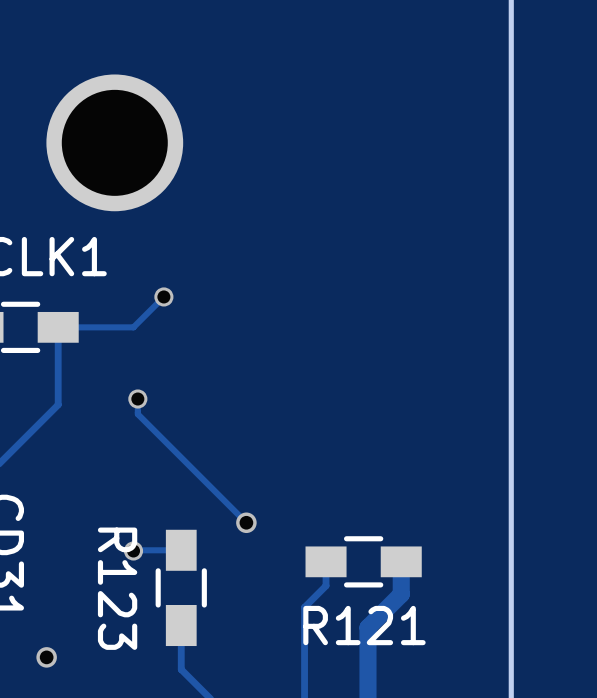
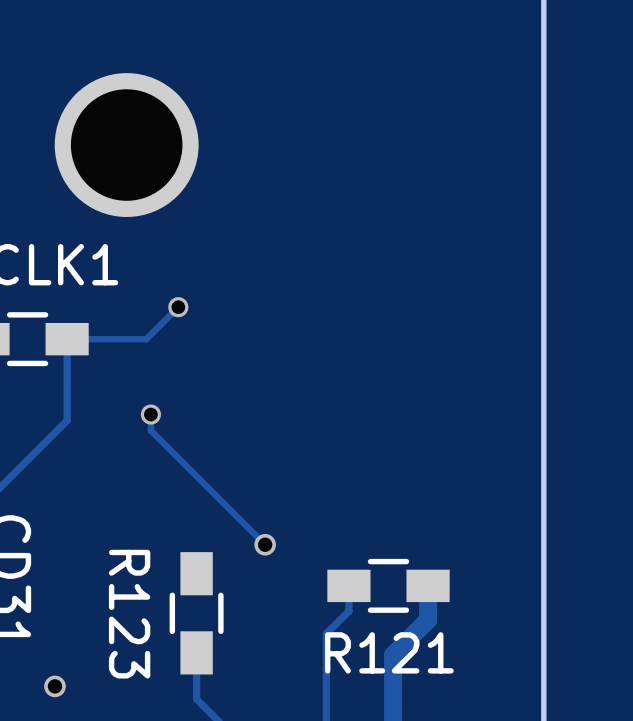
via: (133, 550) -> none
track: (181, 550) (133, 550) -> none

